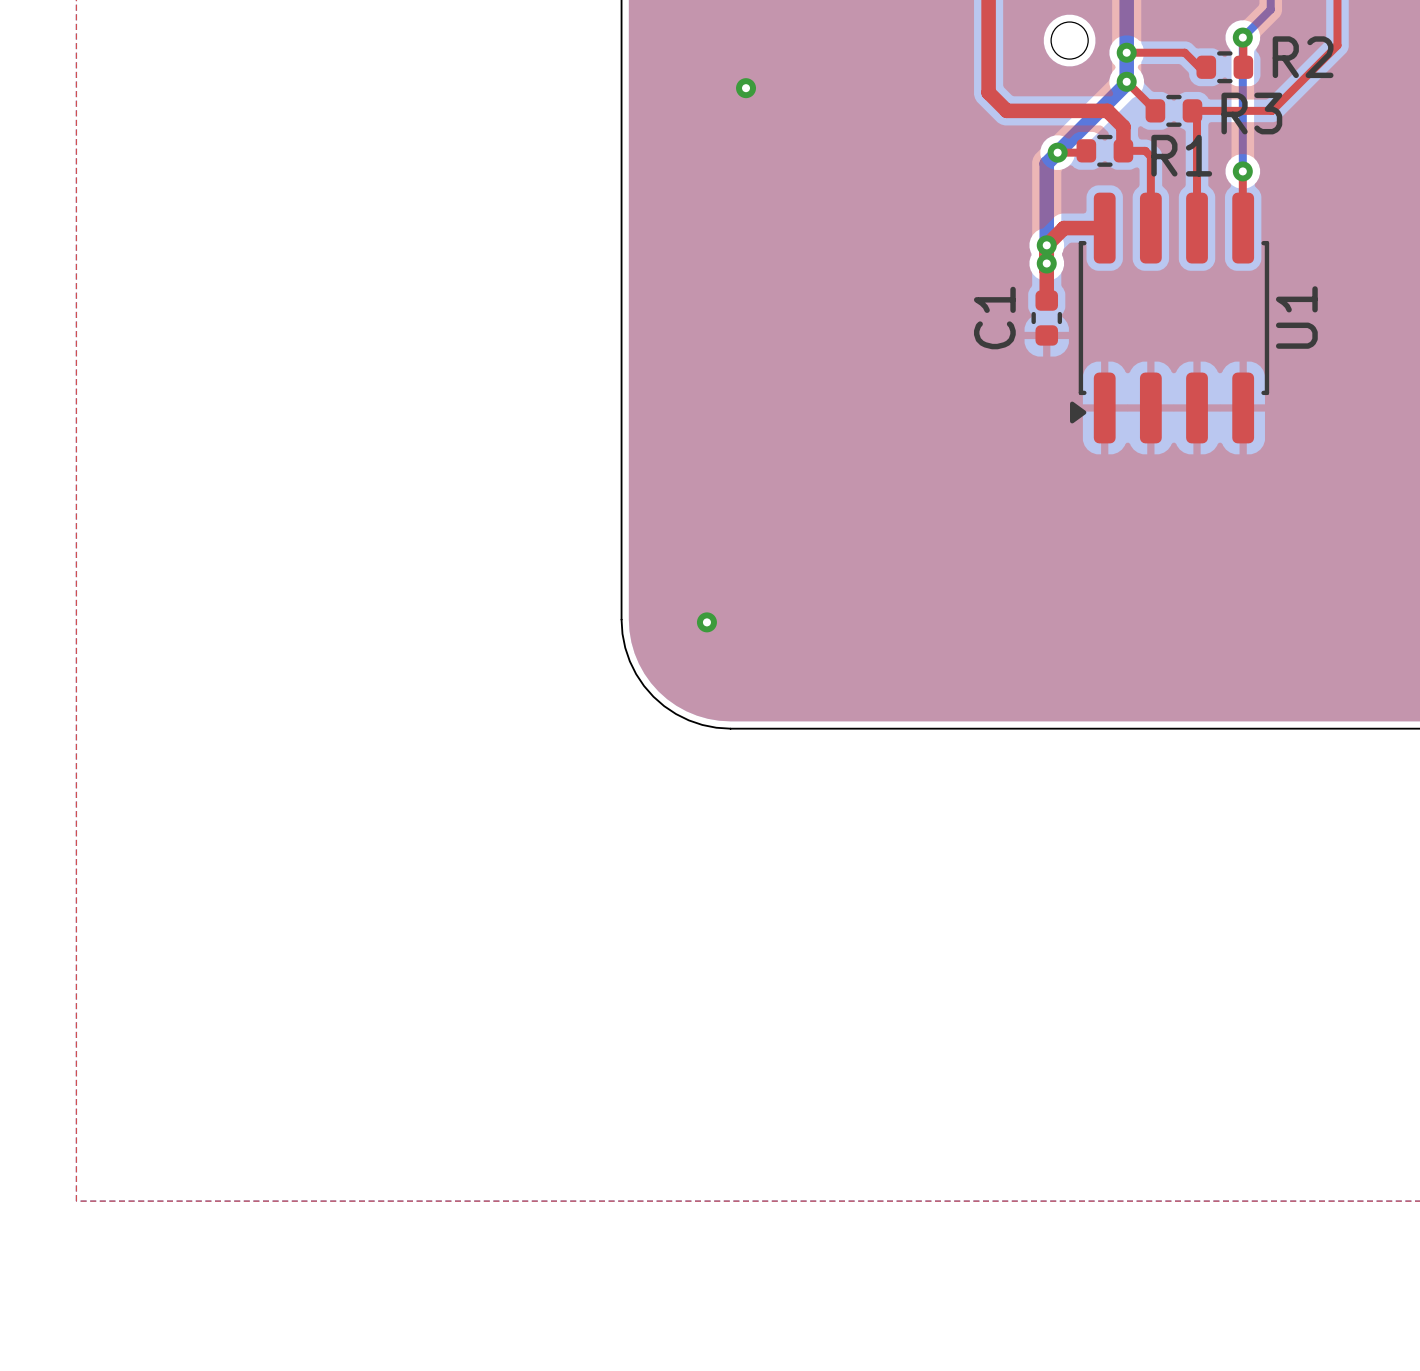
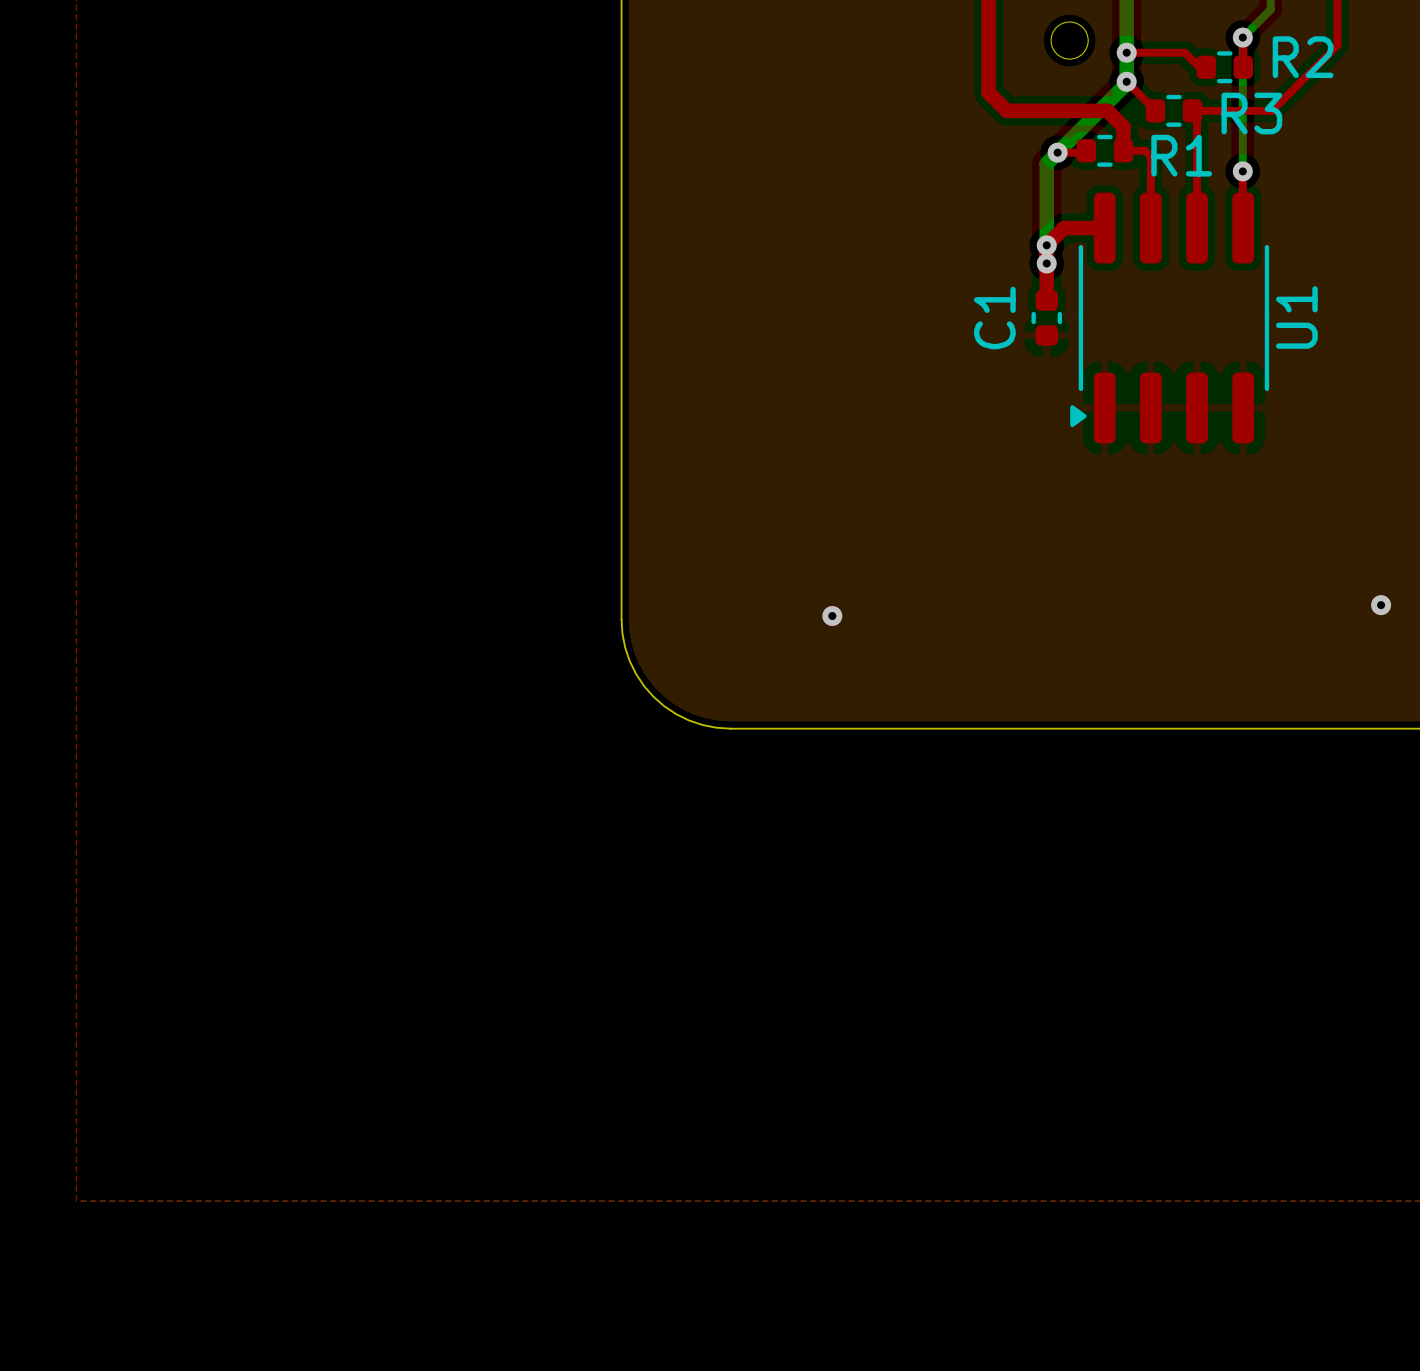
via: (746, 88) -> none
U1 footprint: [1070, 192, 1270, 444] -> [1070, 192, 1270, 444]
via: none -> (1381, 605)
via position: (706, 622) -> (832, 616)

